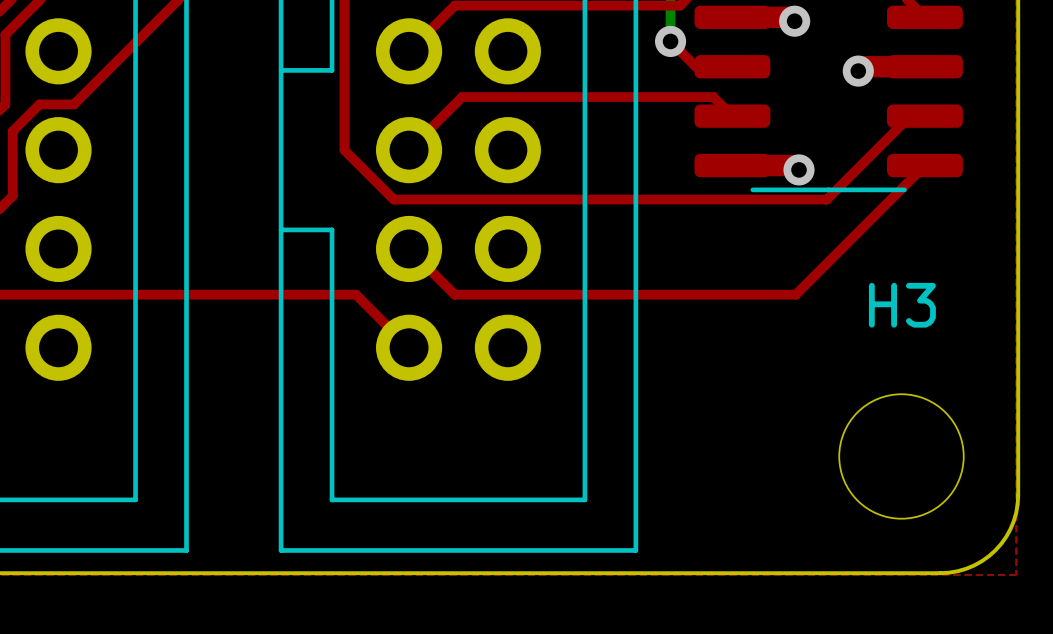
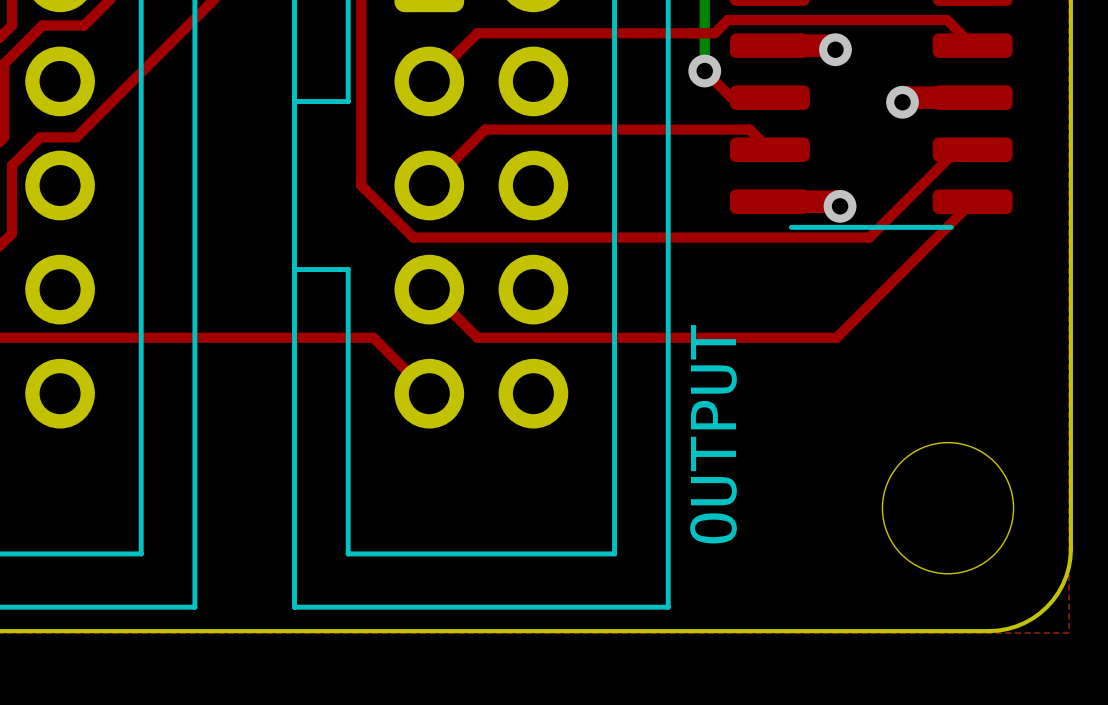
H3 name: H3 (902, 305) -> none
text: none -> OUTPUT (713, 434)

